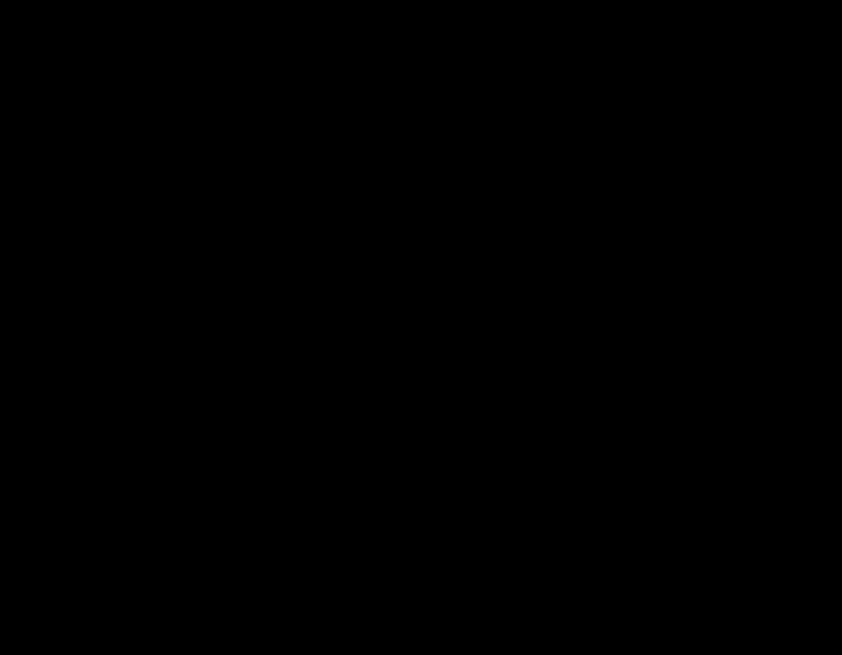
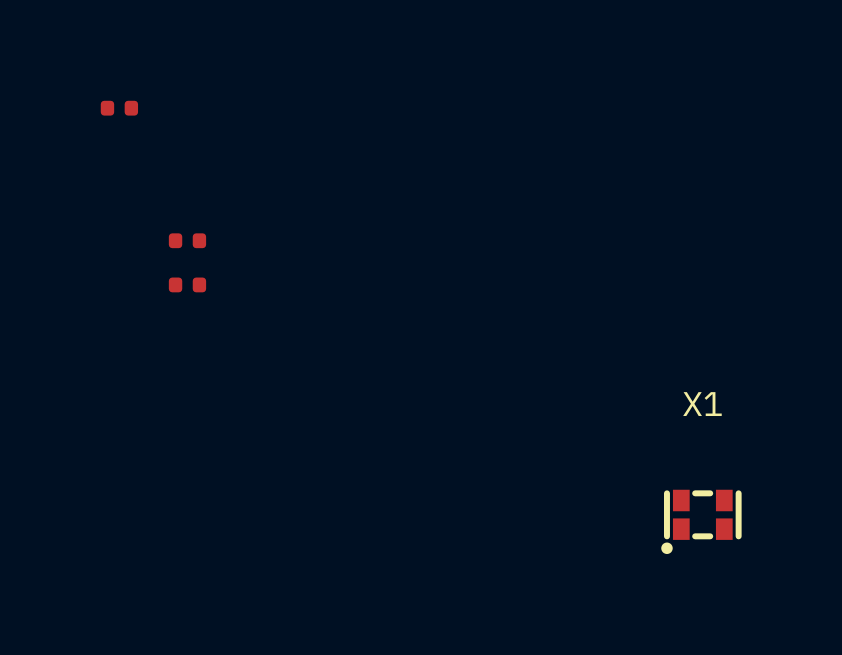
part: none -> (119, 108)
part: none -> (187, 240)
part: none -> (187, 284)
X1: none -> (701, 521)

